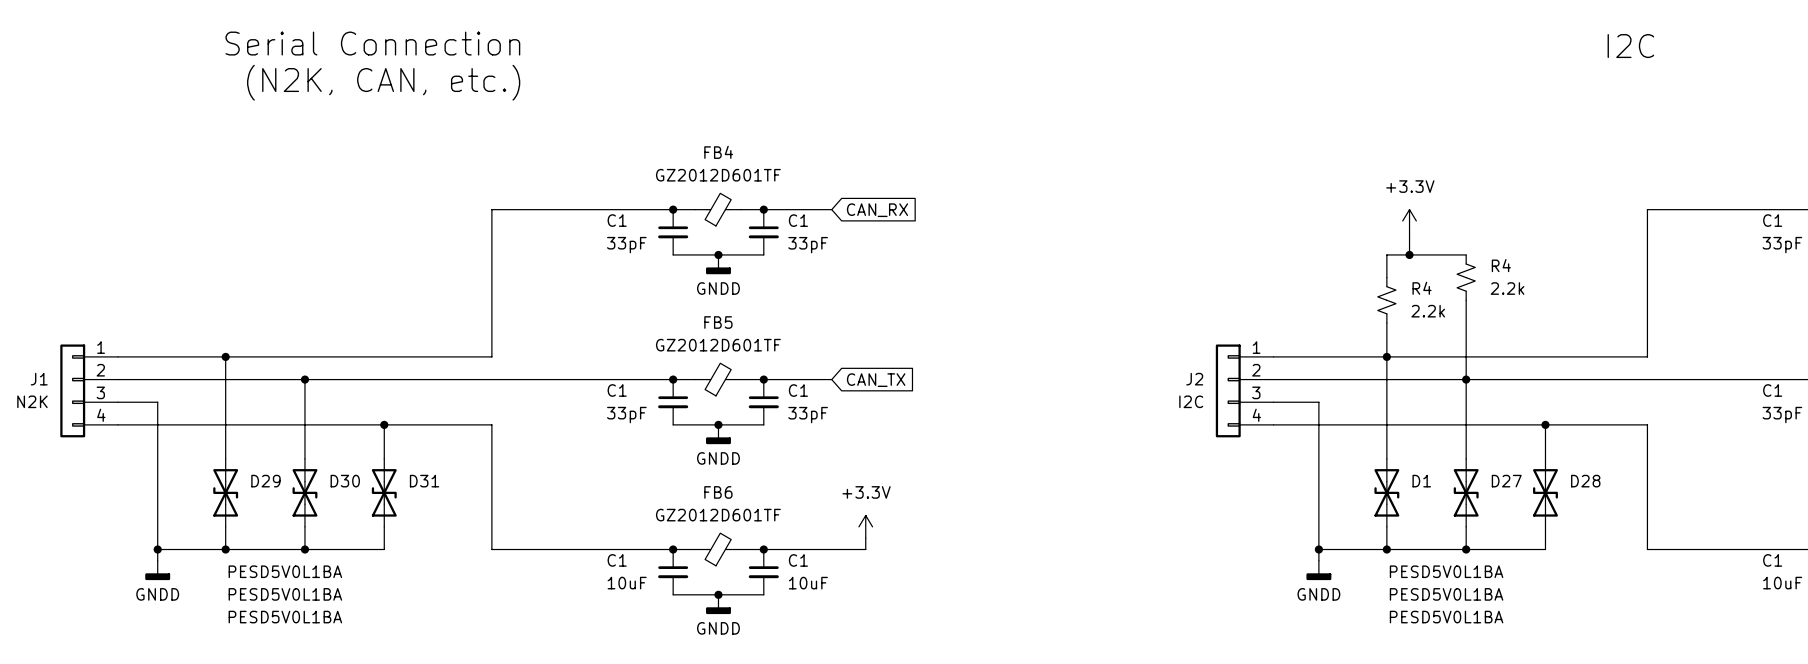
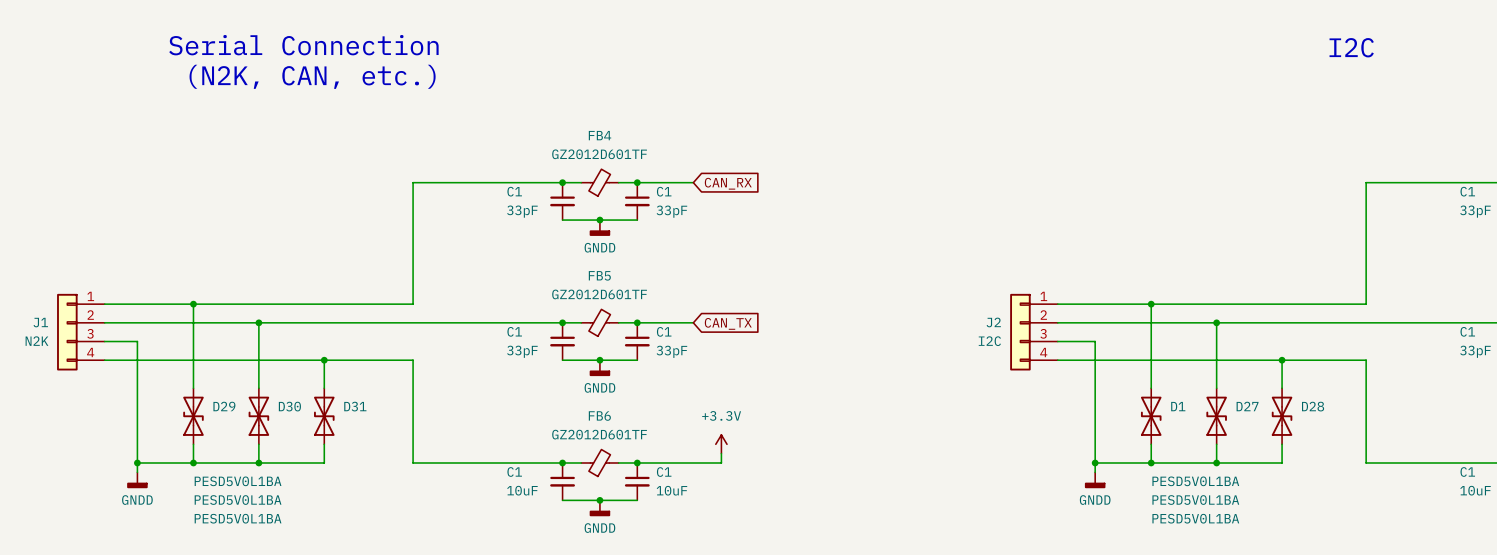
power symbol: +3.3V (1409, 220) -> none
wire: (1409, 232) (1409, 254) -> none
junction: (1409, 254) -> none
wire: (1466, 254) (1386, 254) (1386, 277) -> none
R4: 2.2k (1466, 277) -> none
R4: 2.2k (1386, 300) -> none
wire: (1466, 300) (1466, 379) -> none
wire: (1386, 322) (1386, 356) -> none

